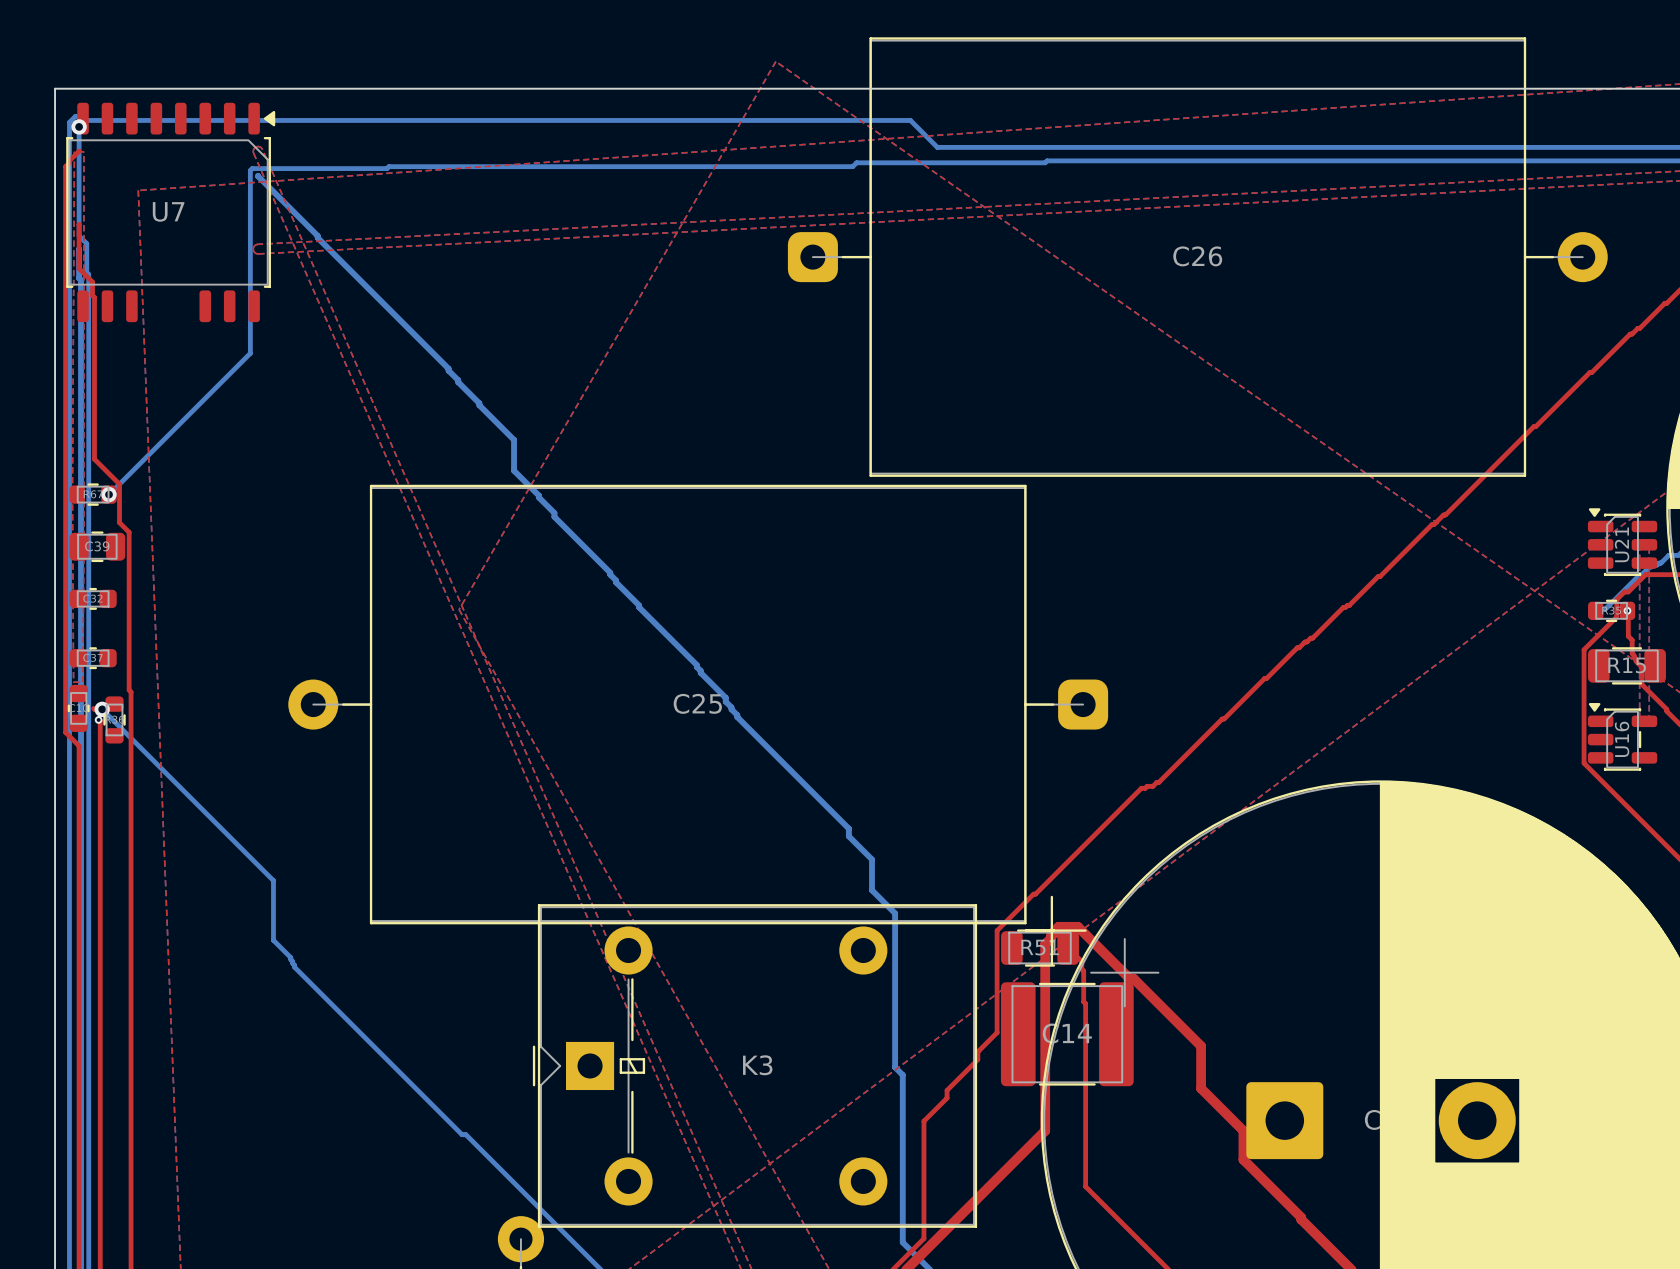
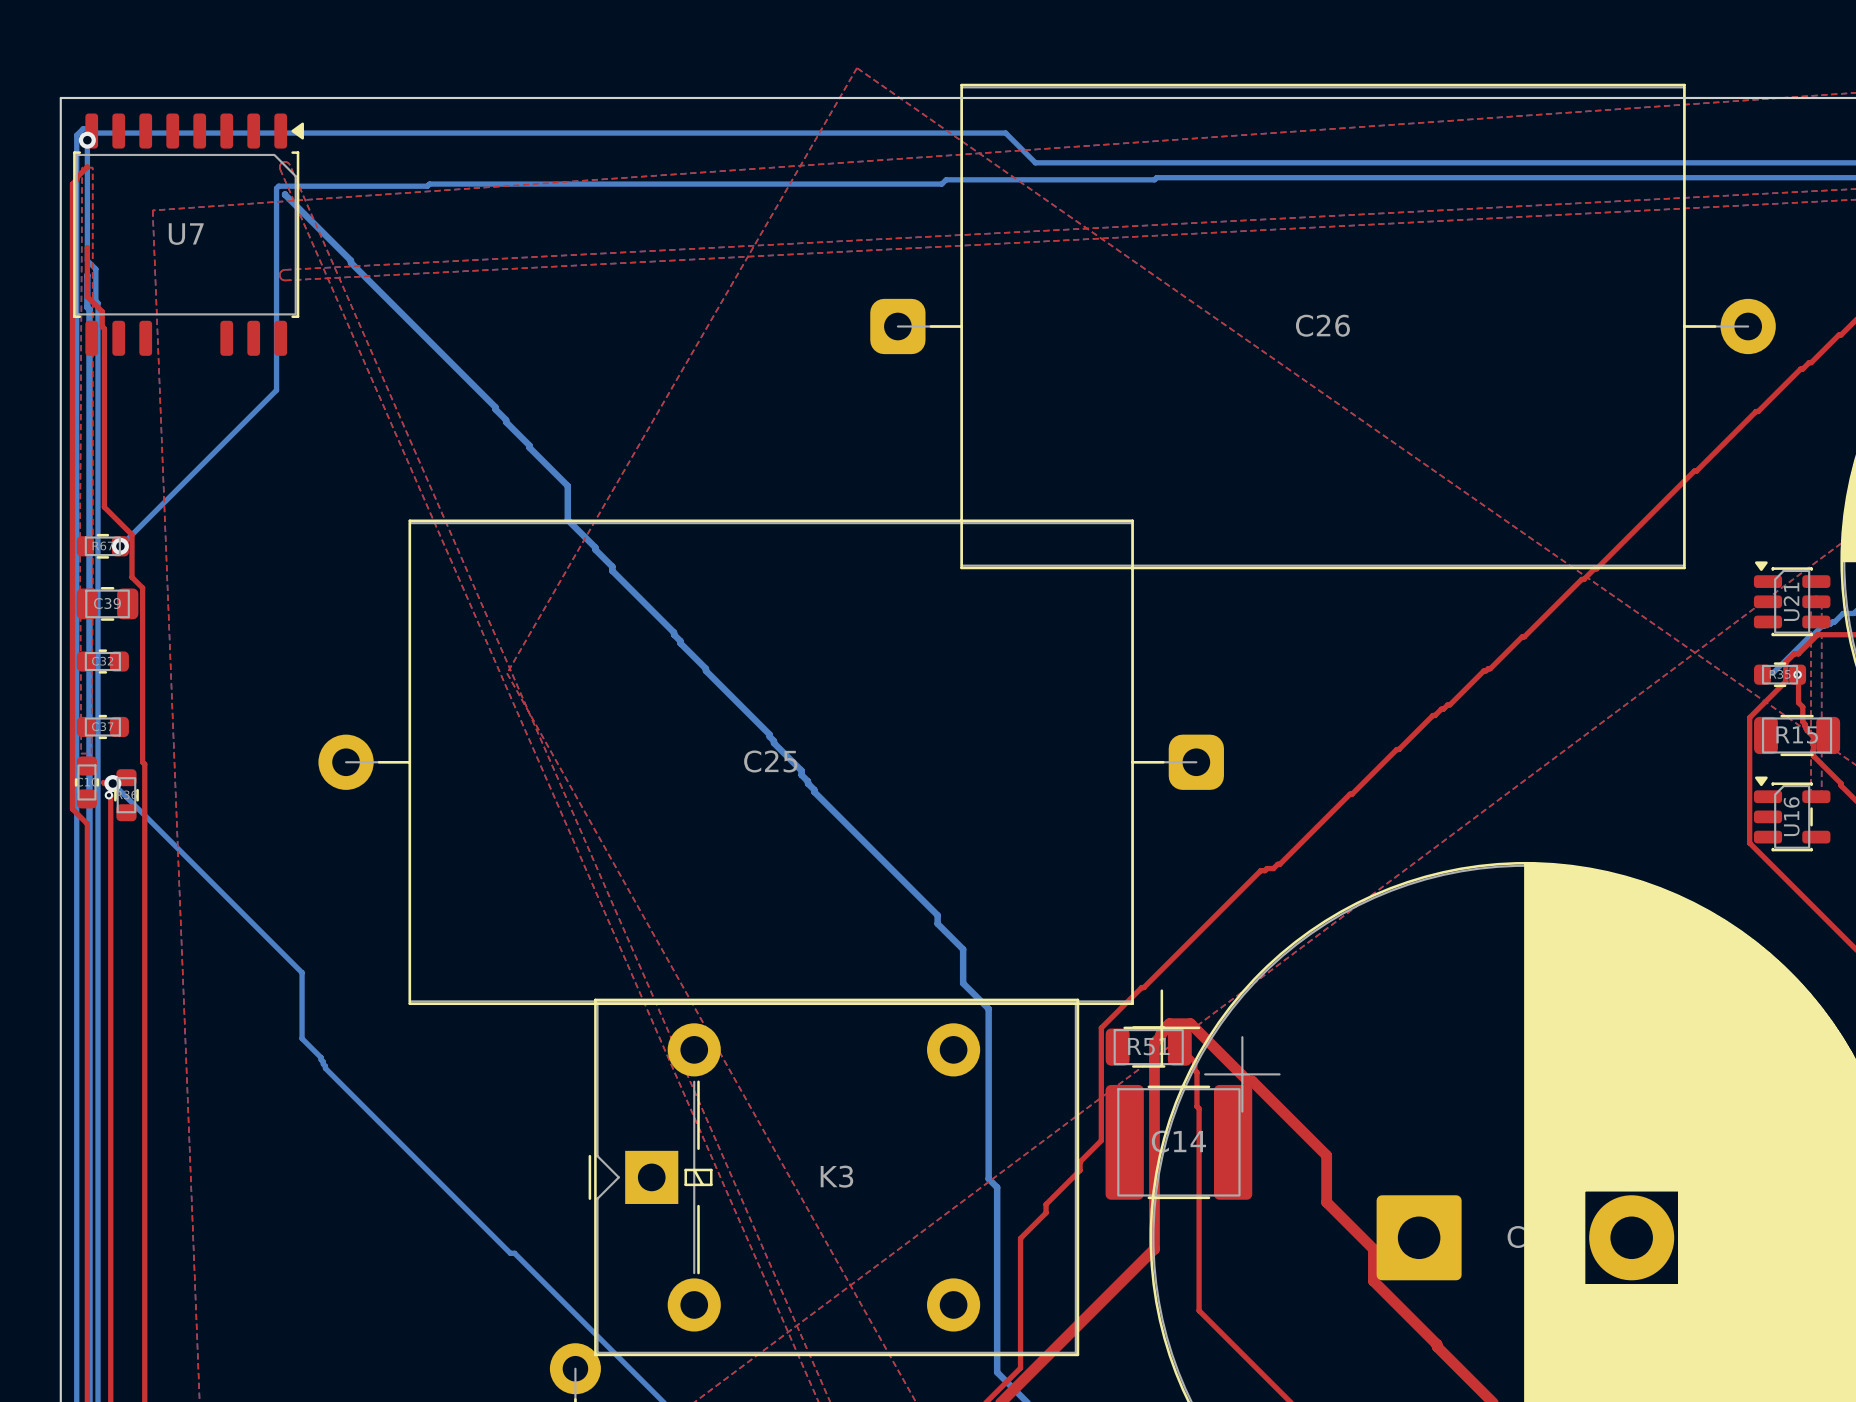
C26 position: (1197, 257) -> (1323, 326)
C25 position: (698, 704) -> (771, 762)

